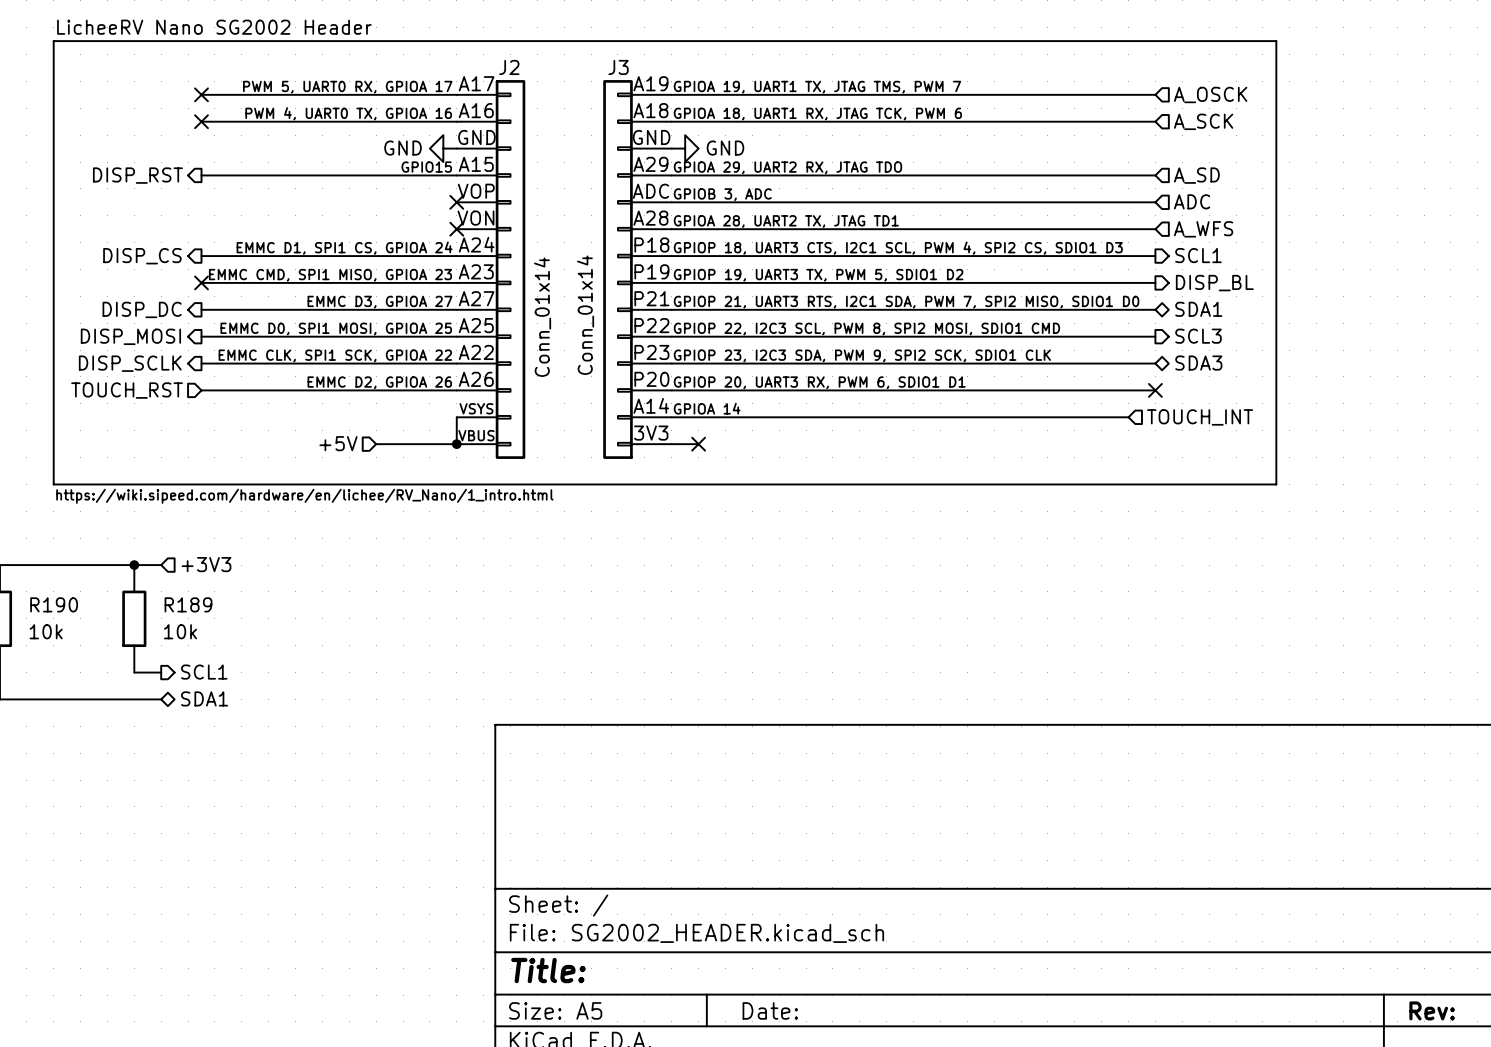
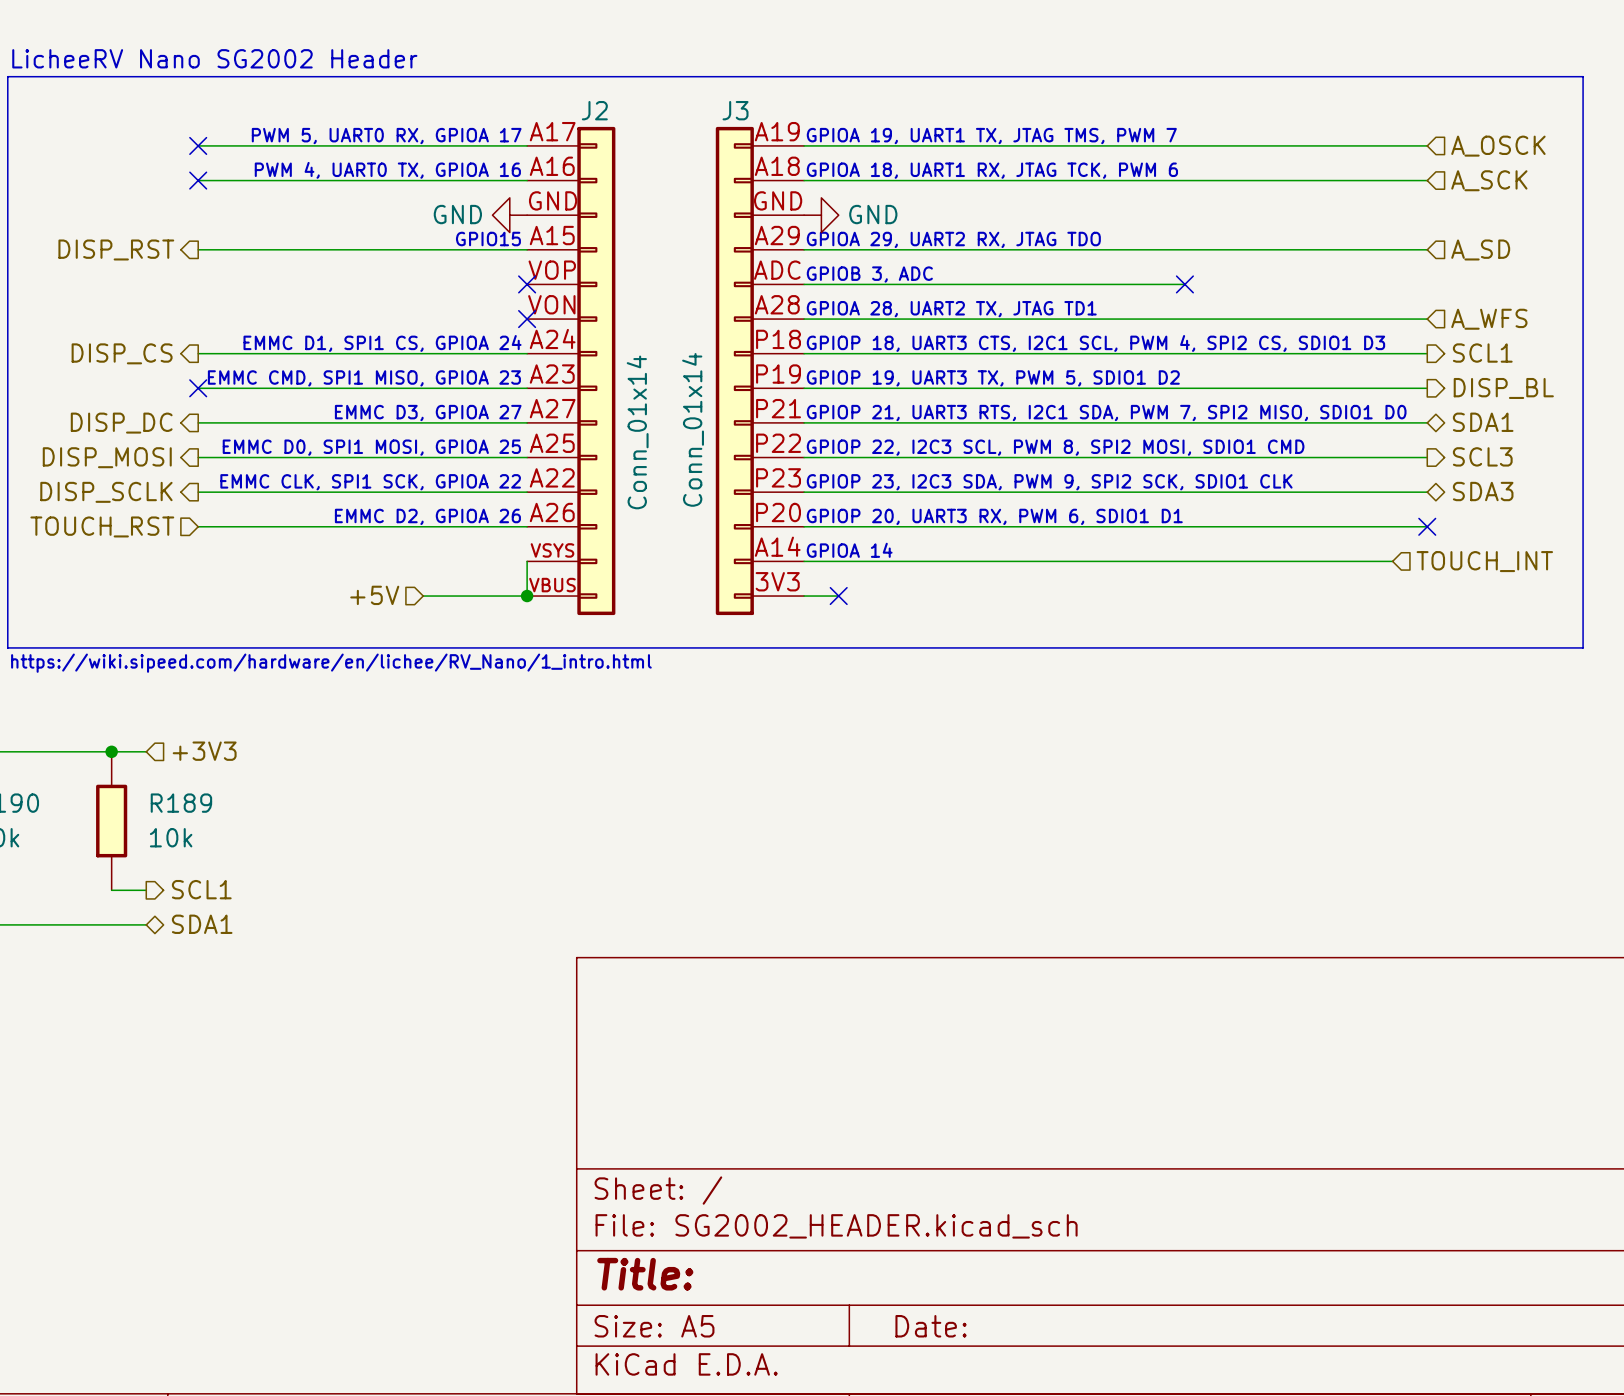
hierarchical label: ADC (1192, 201) -> none
wire: (967, 202) (1155, 202) -> none
no-connect mark: none -> (1184, 284)

